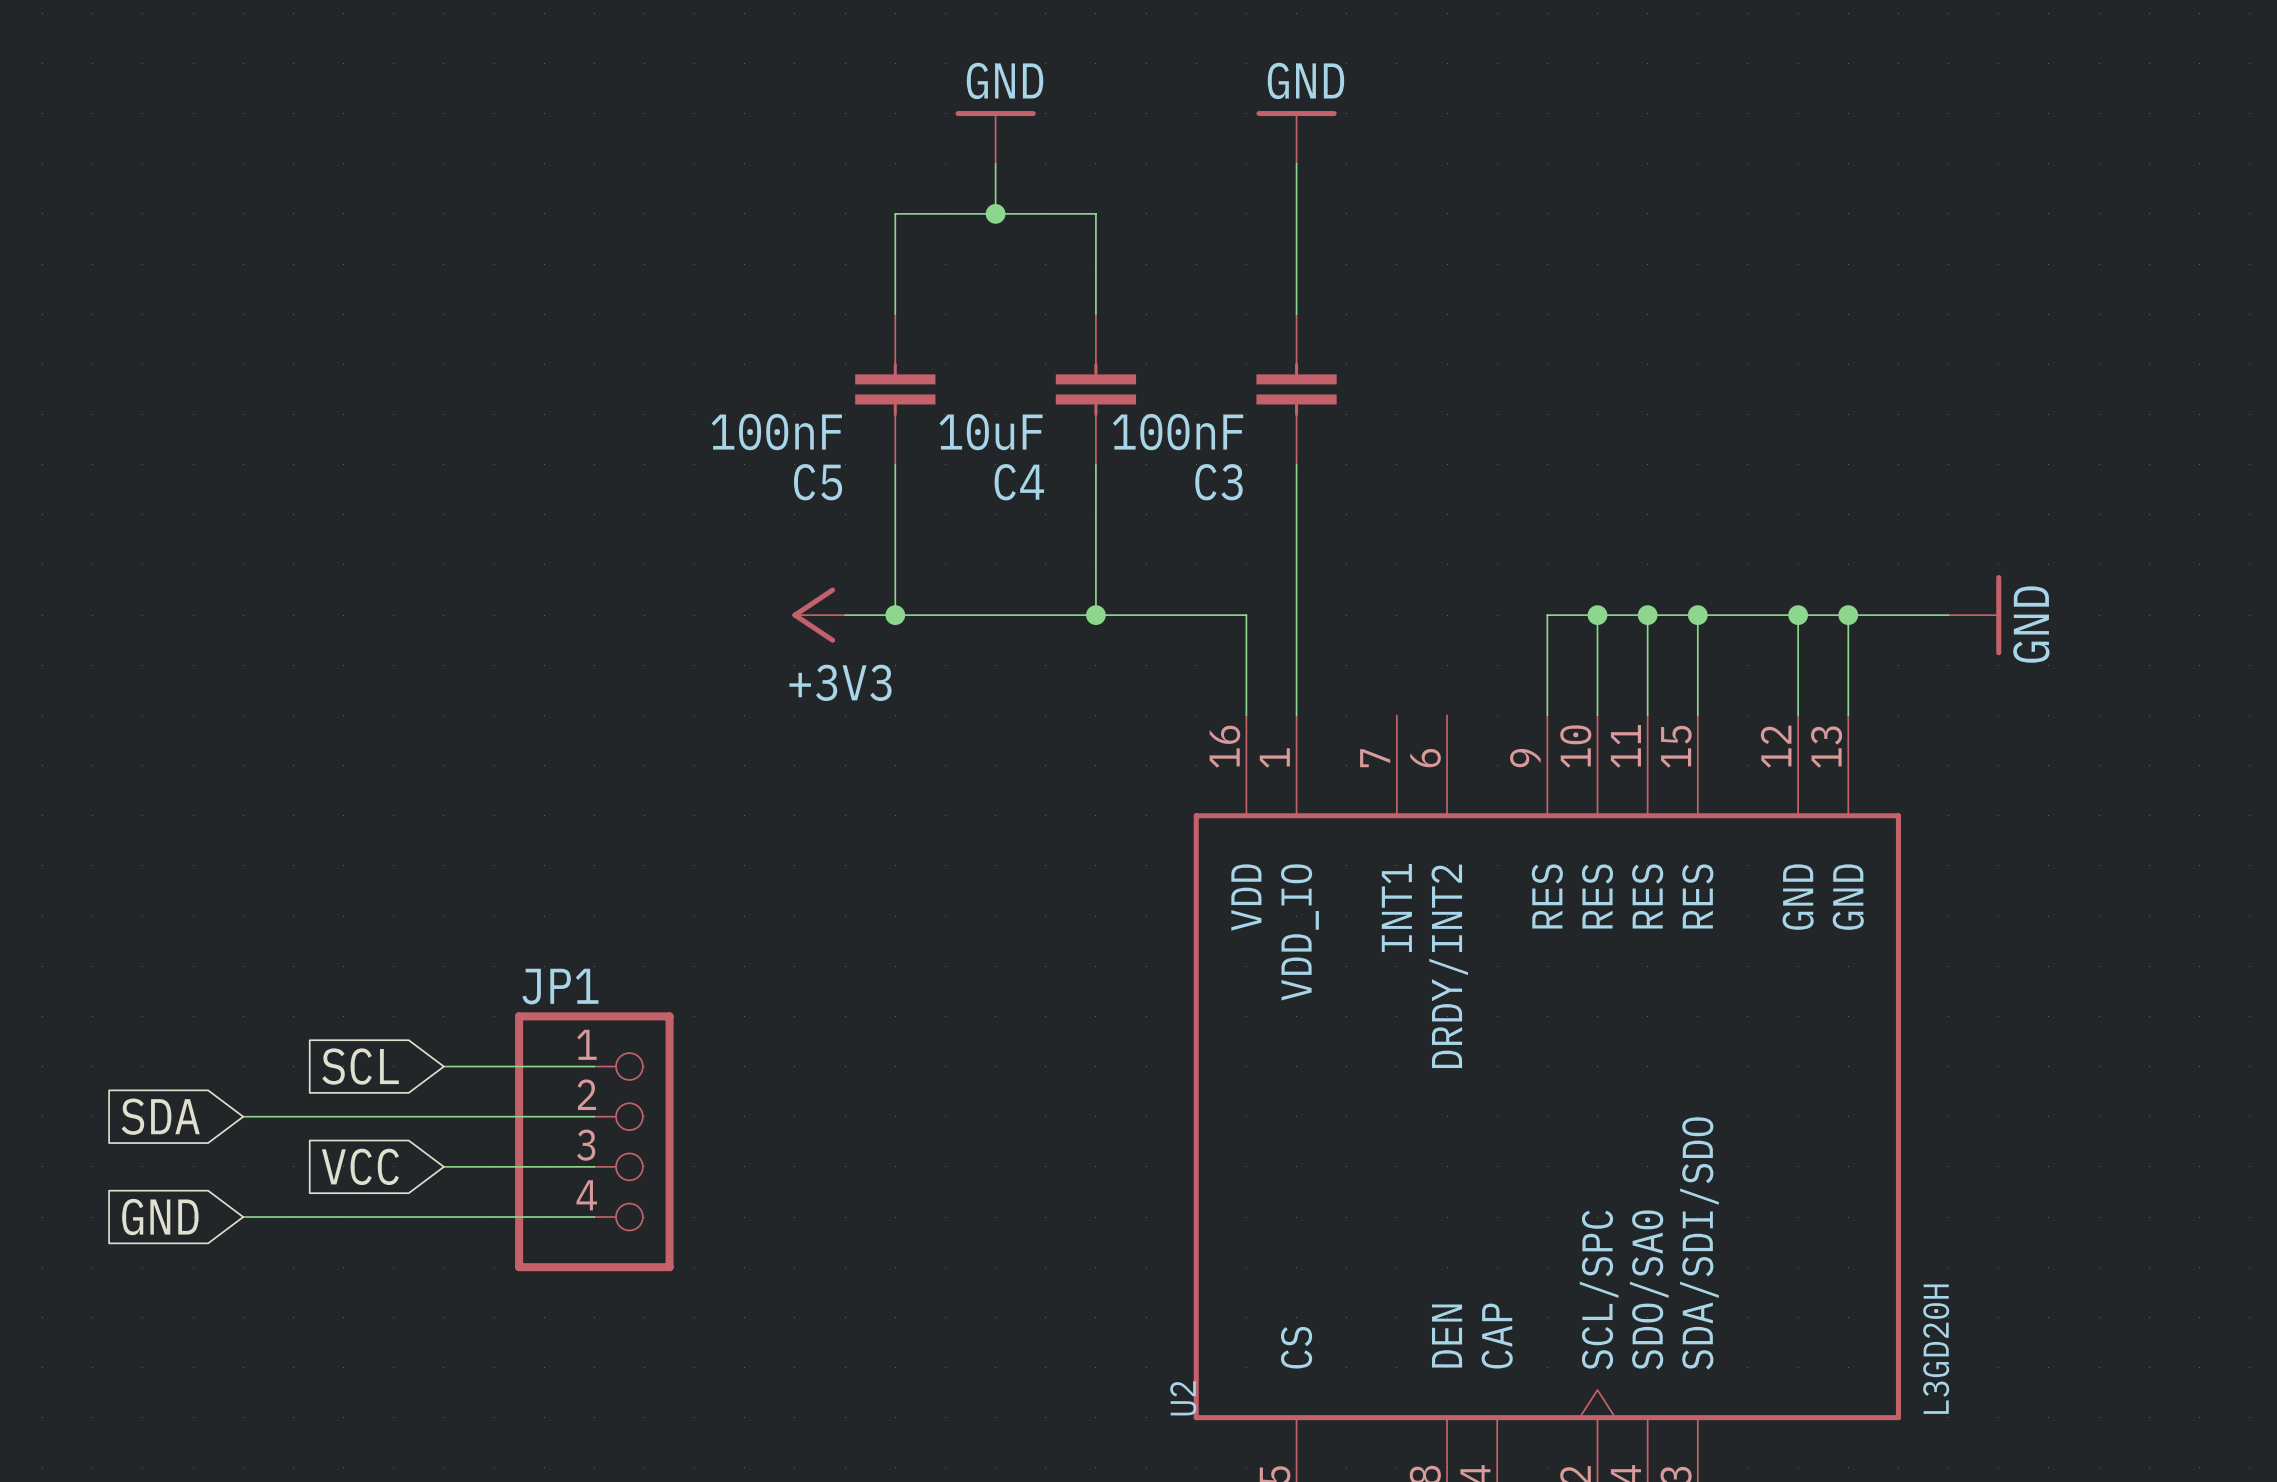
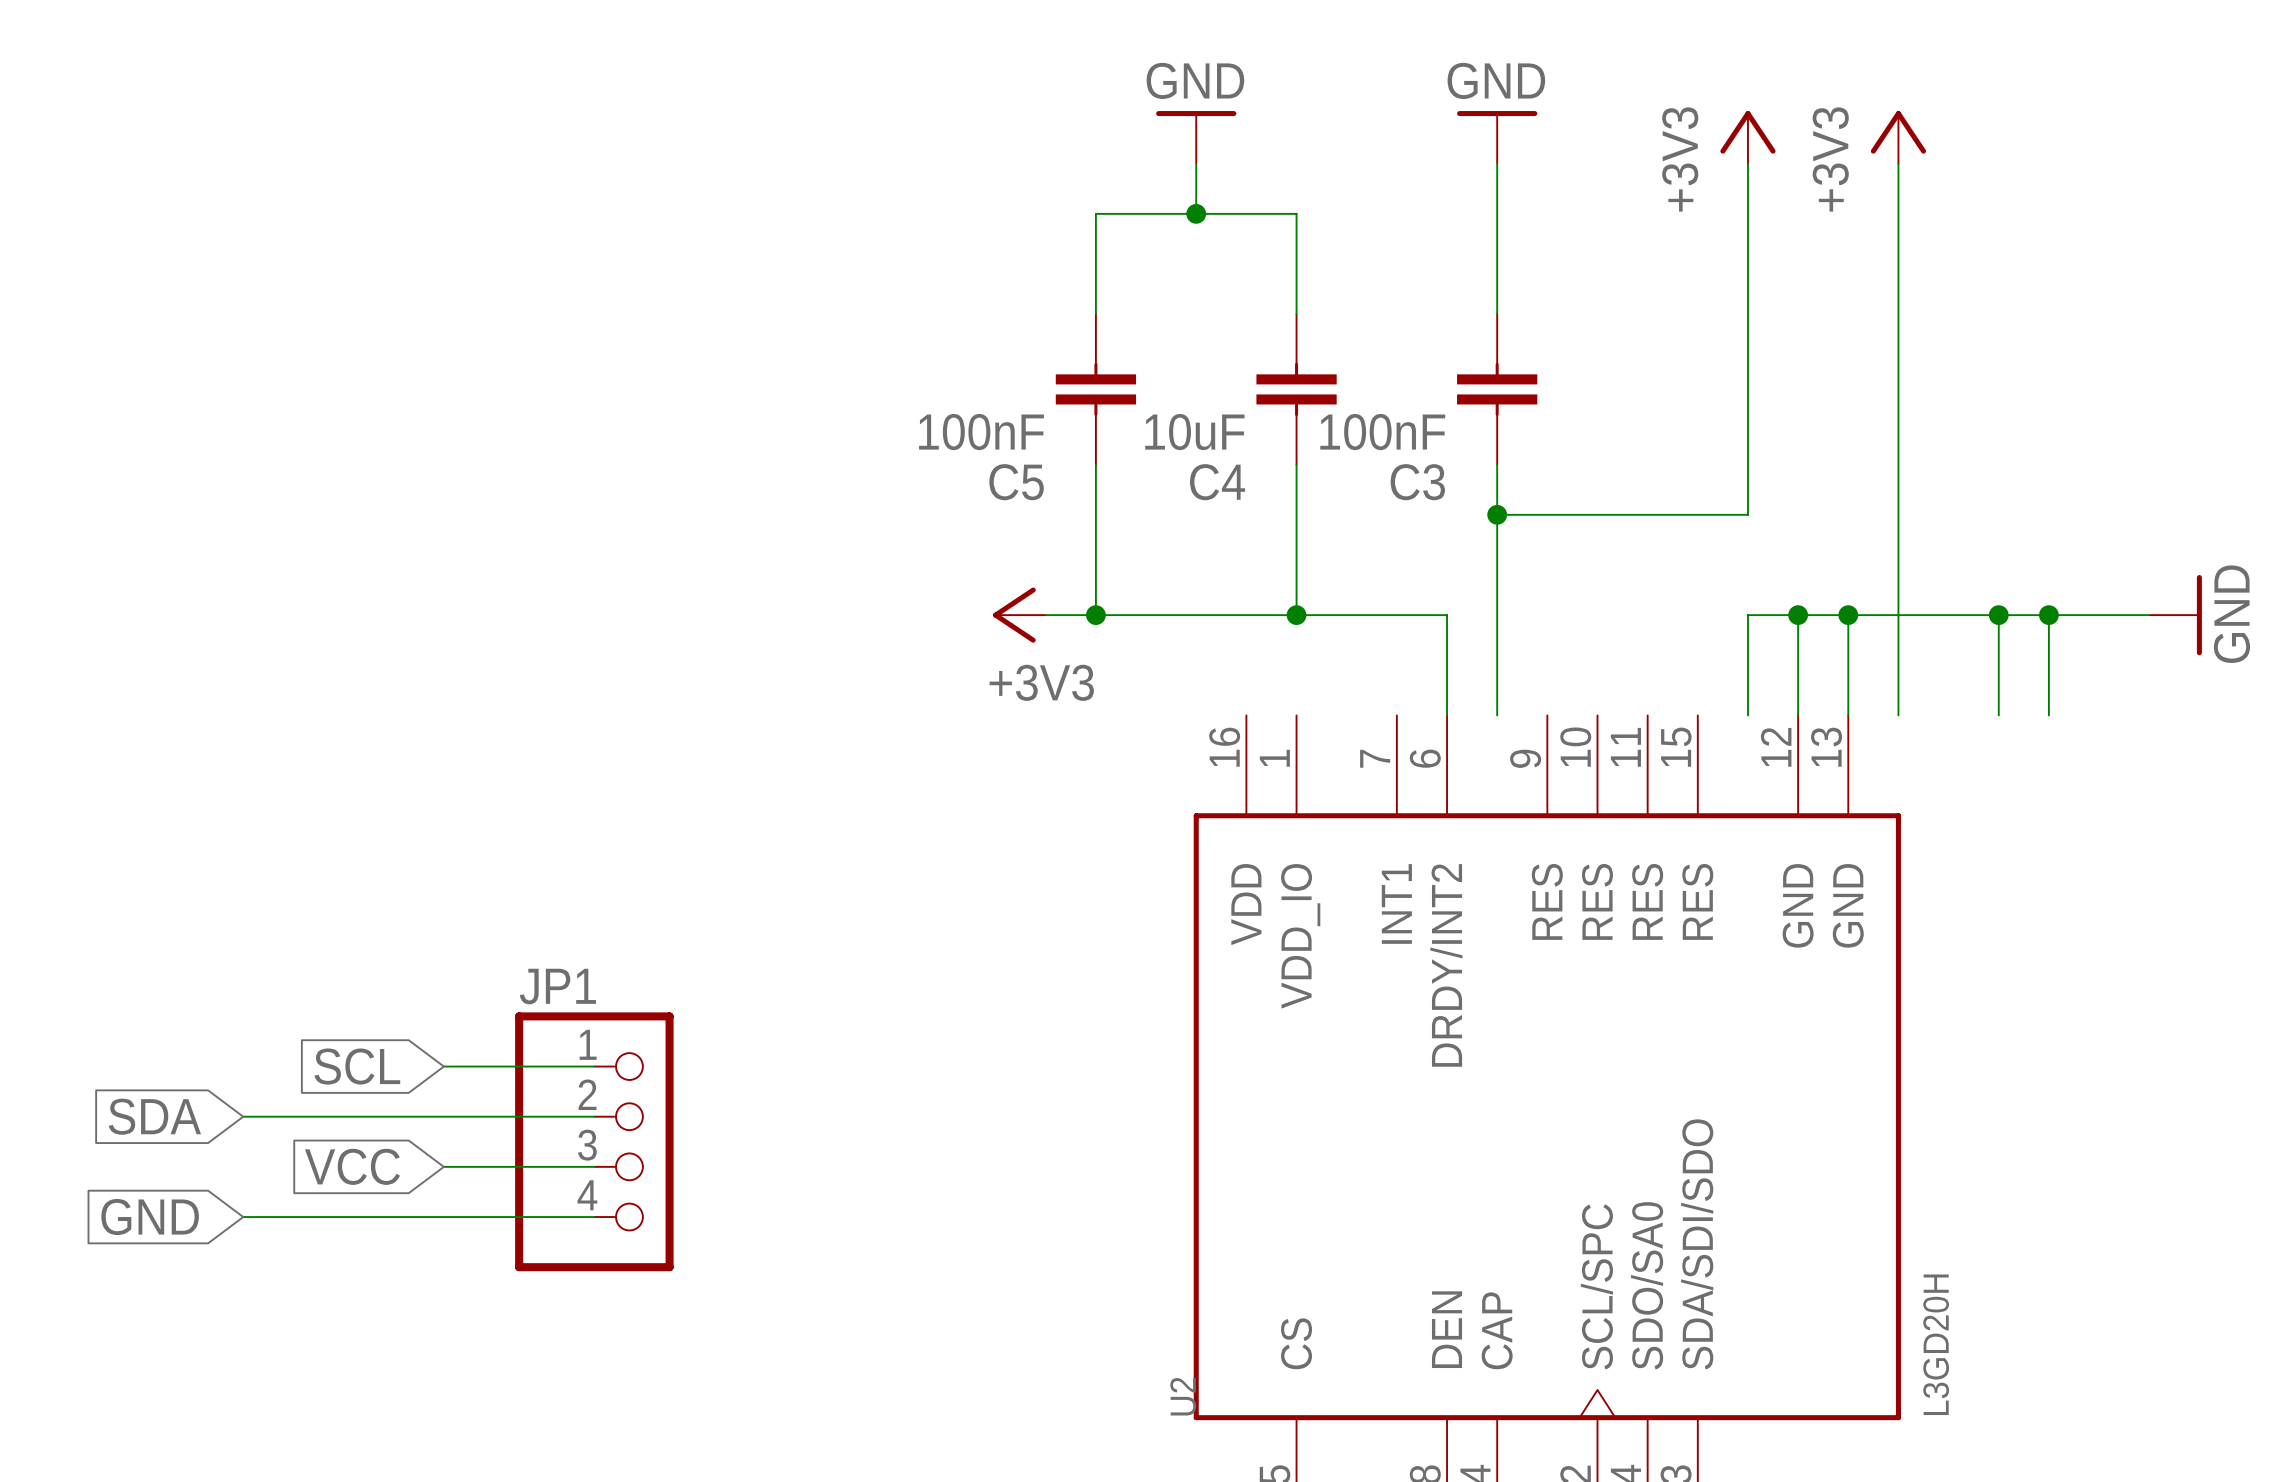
power symbol: GND (995, 137) -> none
power symbol: none -> GND (1196, 137)
power symbol: GND (1296, 137) -> none
power symbol: none -> GND (1497, 137)
power symbol: none -> +3V3 (1747, 137)
power symbol: none -> +3V3 (1898, 137)
wire: (995, 163) (995, 213) -> (1196, 163) (1196, 213)
wire: (1296, 163) (1296, 213) -> (1095, 213) (1296, 213)
wire: none -> (1497, 163) (1497, 314)
wire: none -> (1747, 163) (1747, 514) (1497, 514)
wire: none -> (1898, 163) (1898, 715)
junction: (995, 213) -> none
wire: (1095, 213) (895, 213) (895, 314) -> none
junction: none -> (1196, 213)
C5: 100nF (895, 389) -> none
C3: none -> 100nF (1497, 389)
C4 value: 10uF (991, 432) -> 100nF (981, 432)
C3 value: 100nF (1178, 432) -> 10uF (1194, 432)
wire: (895, 464) (895, 615) -> none
wire: none -> (1497, 464) (1497, 715)
C4 name: C4 (1019, 482) -> C5 (1016, 482)
C3 name: C3 (1218, 482) -> C4 (1217, 482)
junction: none -> (1497, 514)
power symbol position: +3V3 (818, 615) -> +3V3 (1019, 615)
wire: (845, 615) (1045, 615) -> none
junction: (895, 615) -> none
wire: (1246, 615) (1246, 715) -> (1246, 615) (1447, 615) (1447, 715)
wire: (1296, 615) (1296, 715) -> none
junction: none -> (1296, 615)
wire: (1597, 615) (1597, 715) -> none
junction: (1597, 615) -> none
wire: (1647, 615) (1647, 715) -> (1998, 615) (1998, 715)
junction: (1647, 615) -> none
wire: (1697, 615) (1697, 715) -> (2048, 615) (2048, 715)
junction: (1697, 615) -> none
wire: (1747, 615) (1547, 615) (1547, 715) -> (1747, 615) (1747, 715)
wire: none -> (1948, 615) (2149, 615)
power symbol position: GND (1974, 615) -> GND (2175, 615)
junction: none -> (1998, 615)
junction: none -> (2048, 615)

